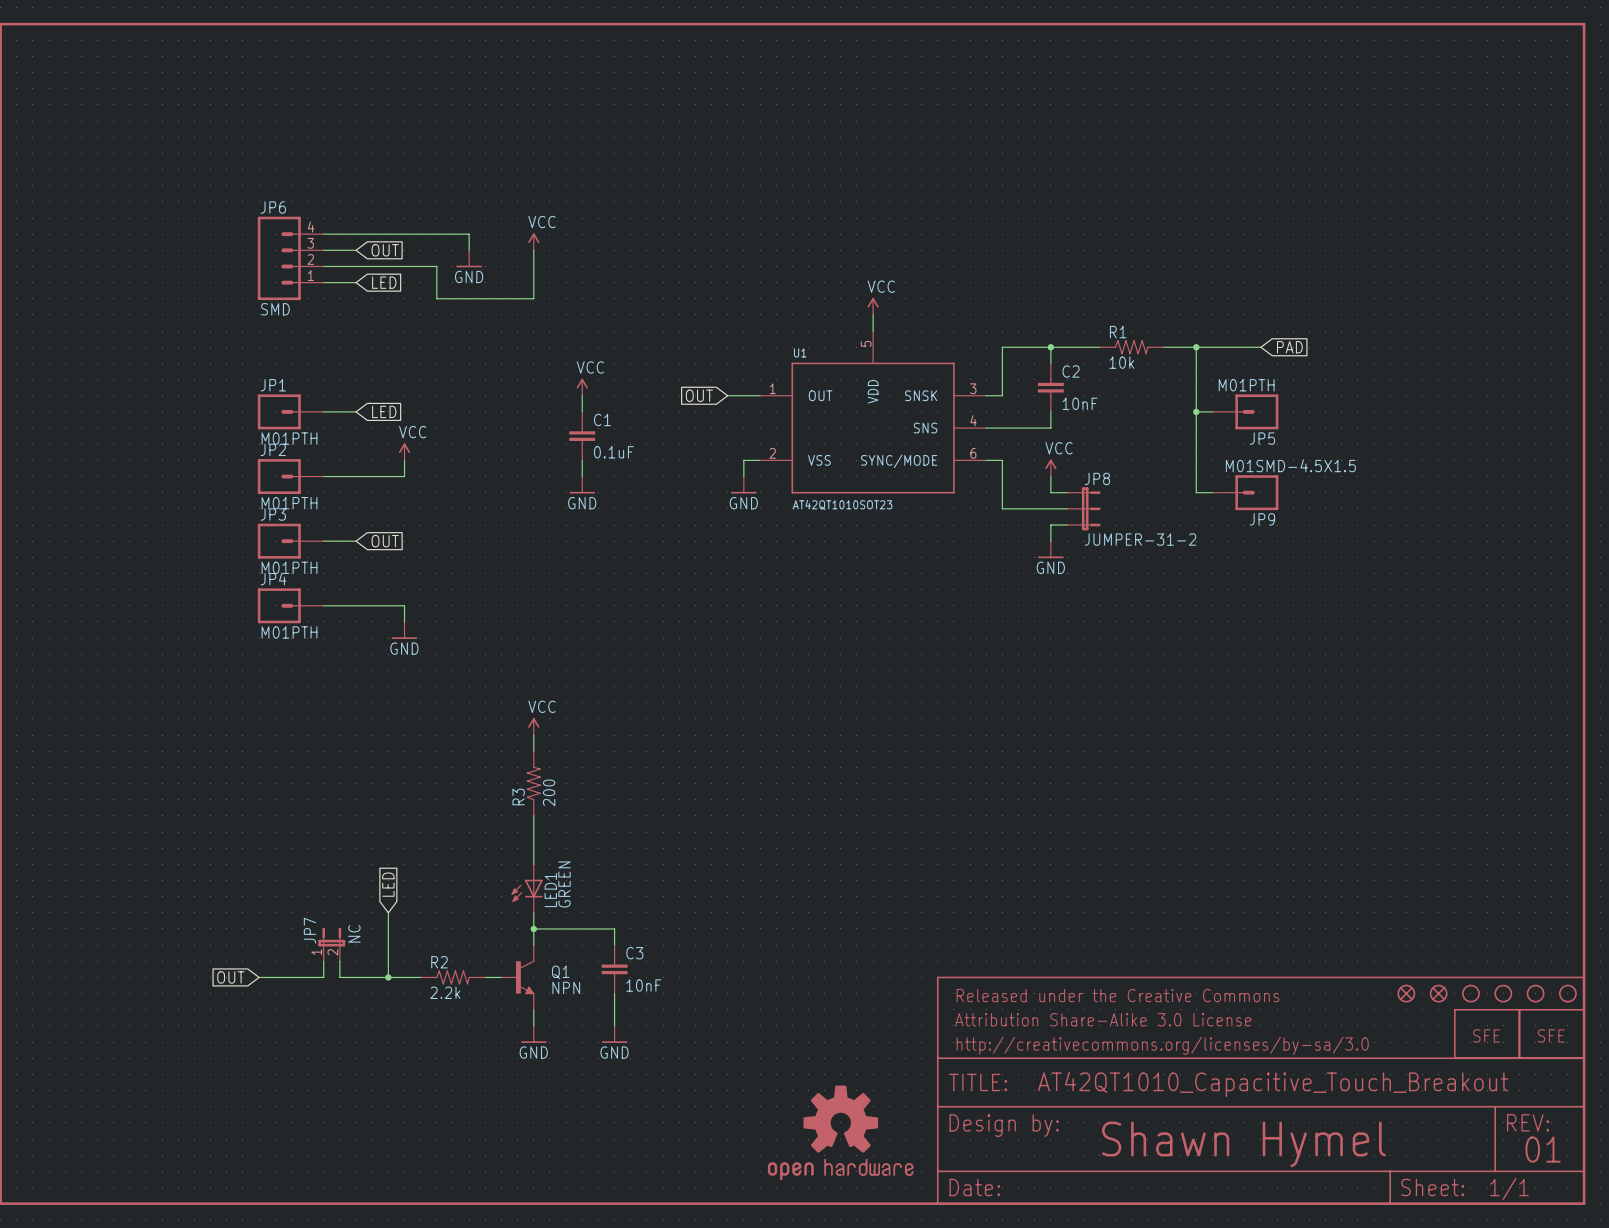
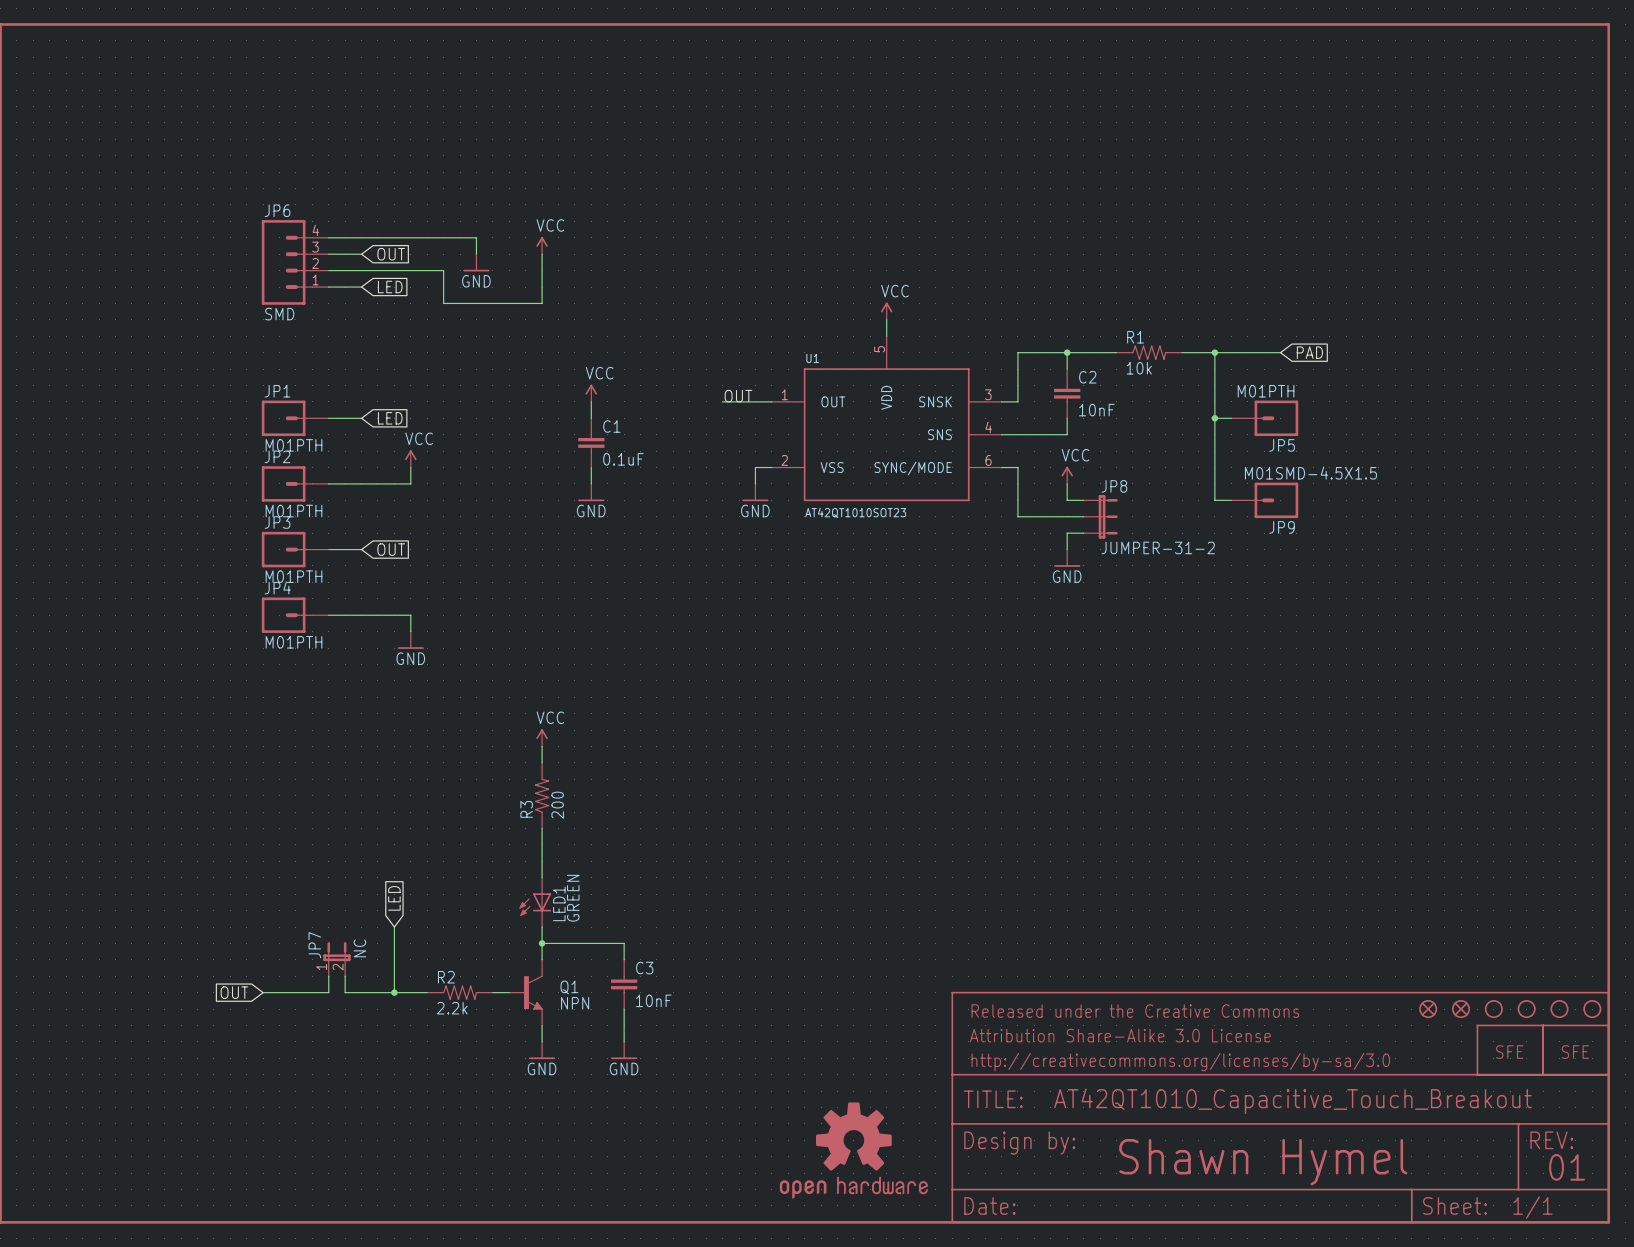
label: none -> OUT (738, 396)
global label: OUT (699, 395) -> none
wire: none -> (722, 401) (739, 401)

